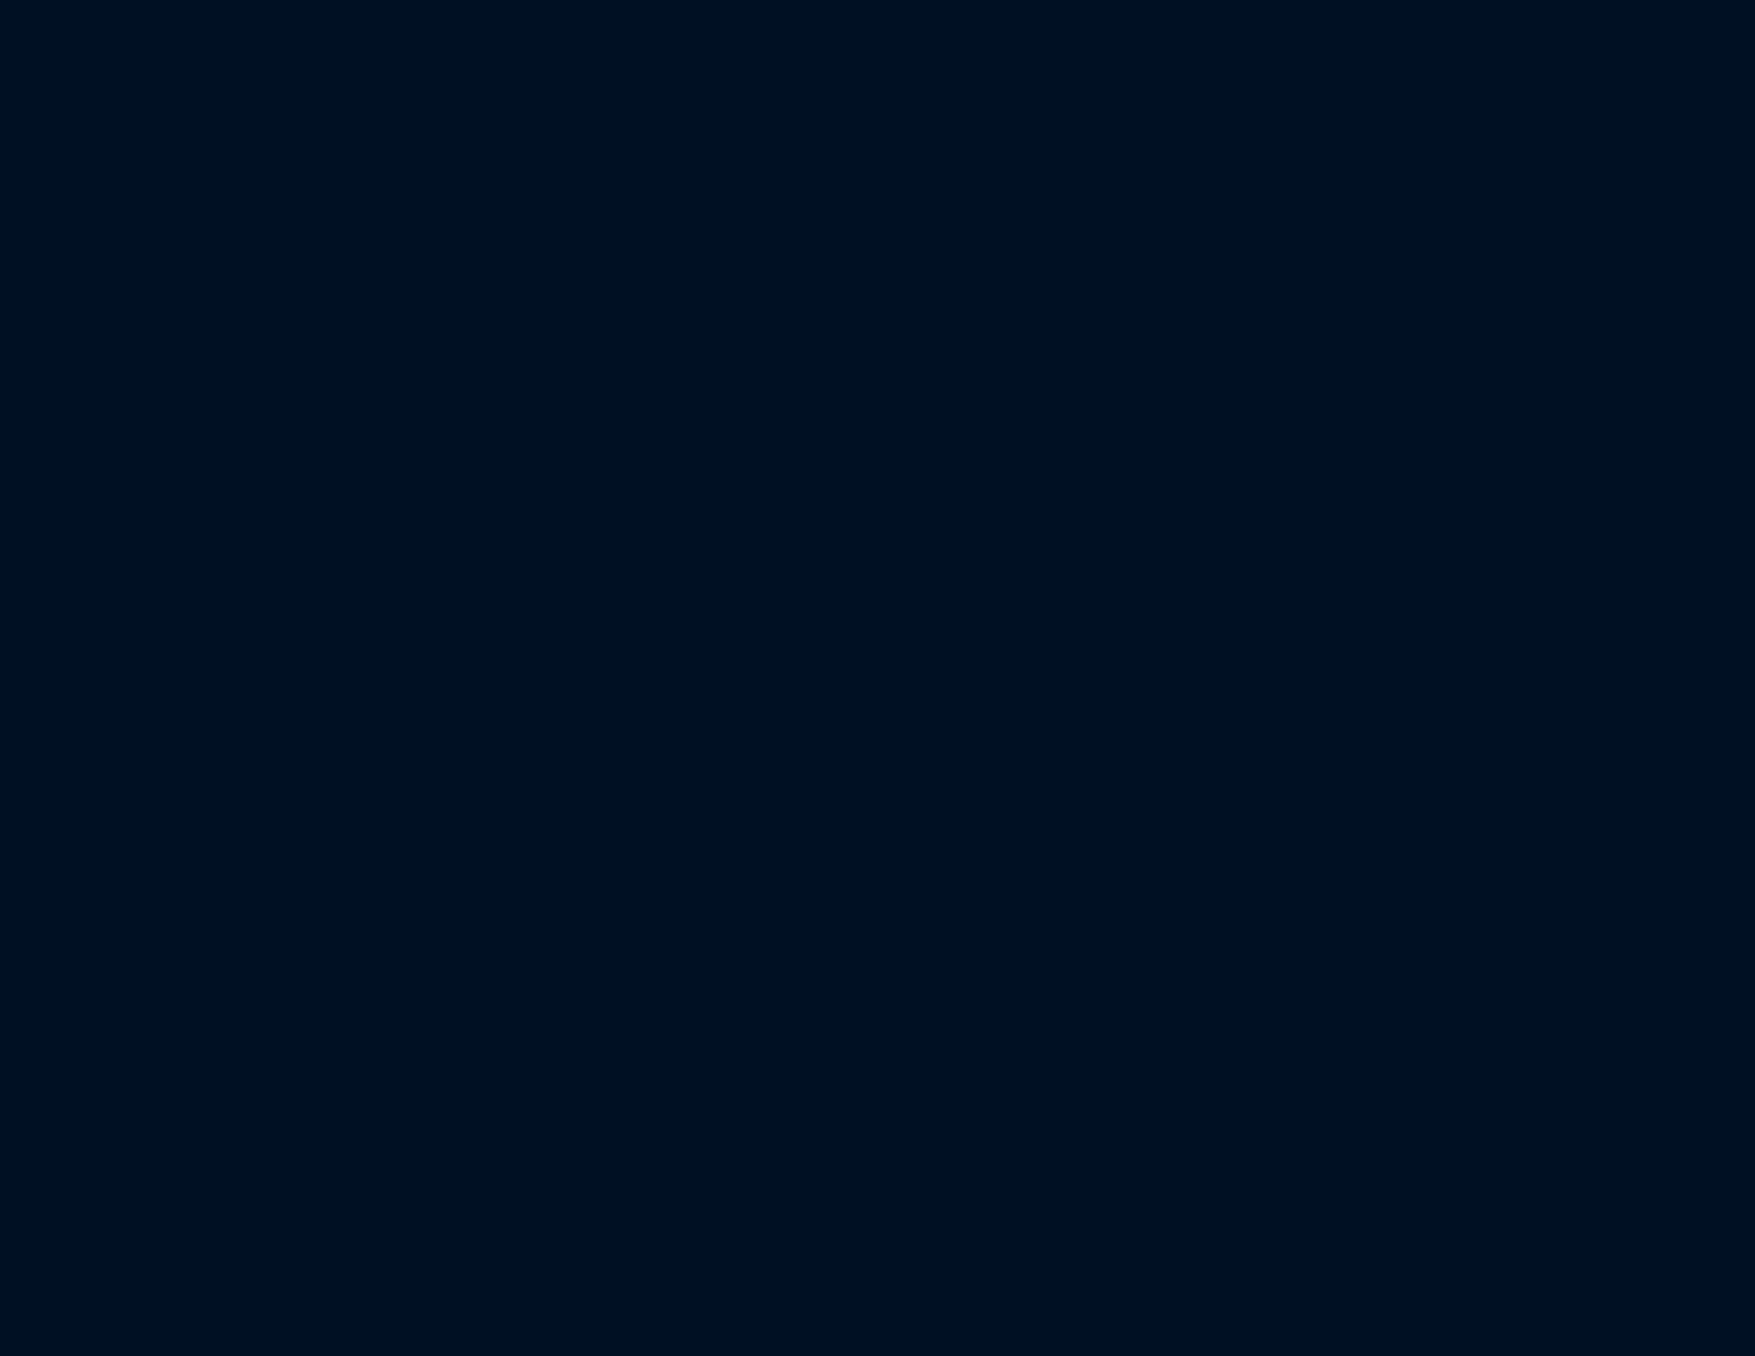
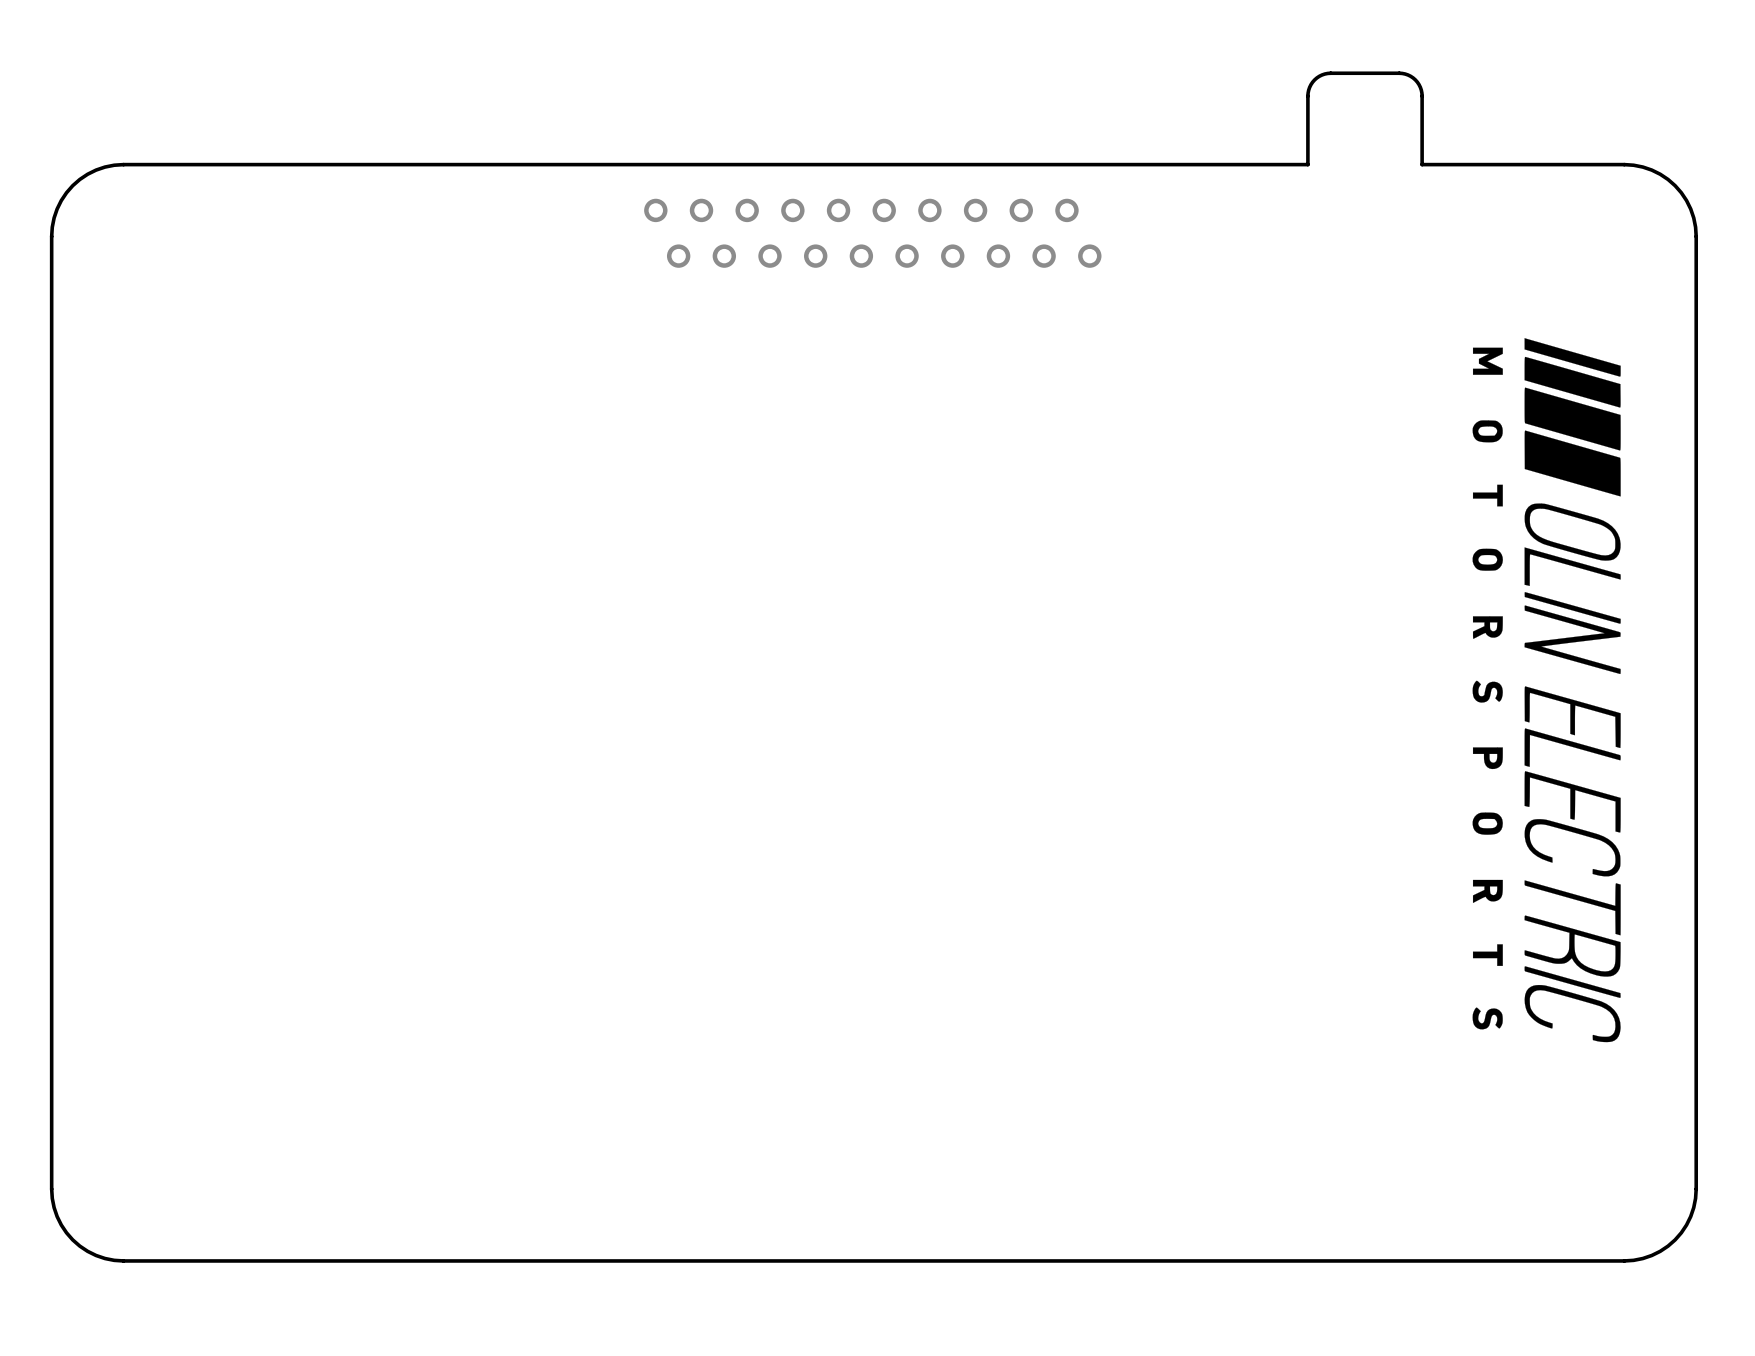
board edge: none -> (1399, 73) (1327, 73) (1314, 79) (1308, 93) (1307, 164) (123, 164) (96, 170) (79, 179) (61, 200) (54, 217) (51, 236) (51, 1189) (57, 1216) (66, 1232) (79, 1246) (96, 1255) (123, 1260) (1624, 1260) (1642, 1258) (1668, 1246) (1681, 1232) (1690, 1216) (1696, 1189) (1696, 236) (1693, 217) (1686, 200) (1675, 185) (1660, 174) (1633, 165) (1422, 164) (1421, 90) (1413, 77) (1399, 73)
part: none -> (872, 233)
drawing: none -> [1472, 338, 1621, 1043]

